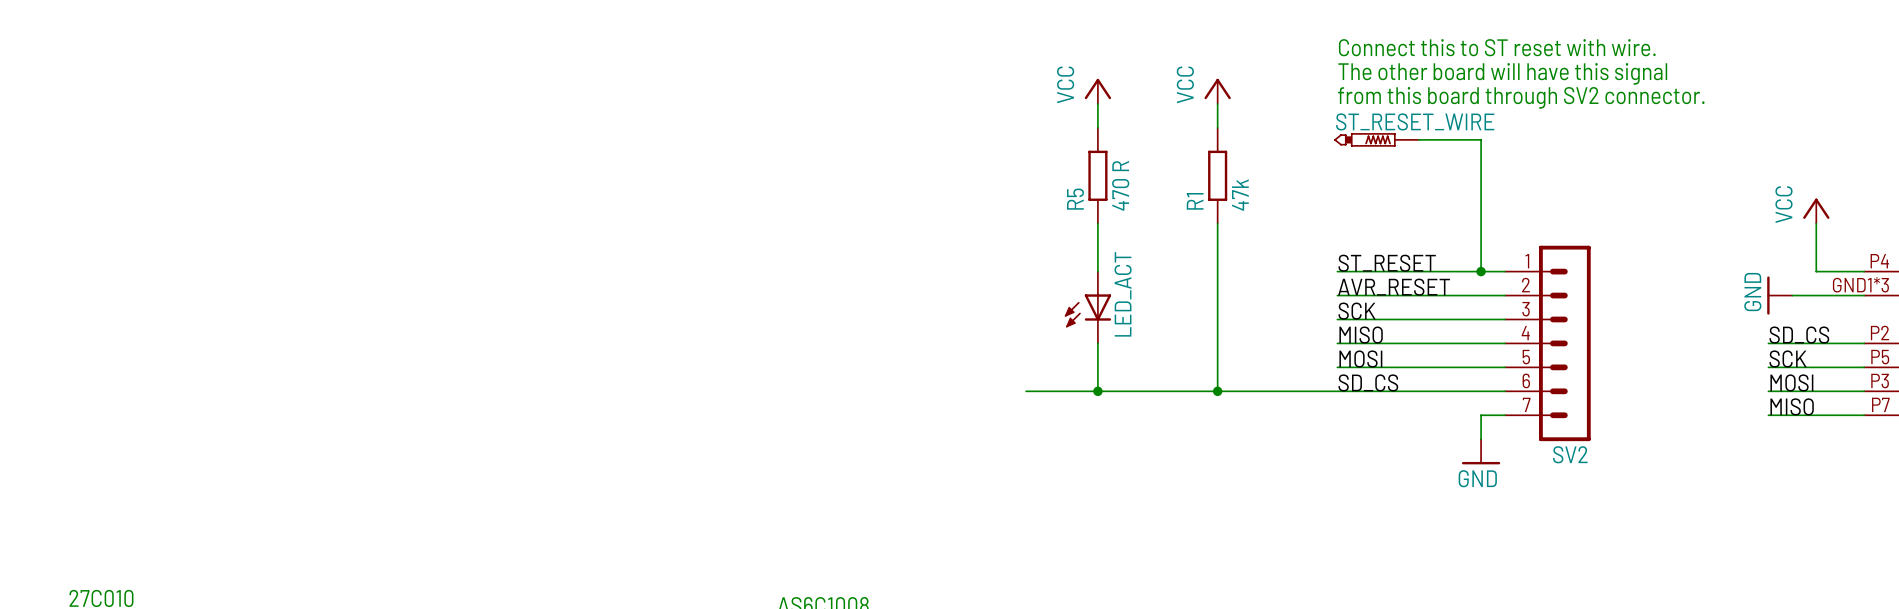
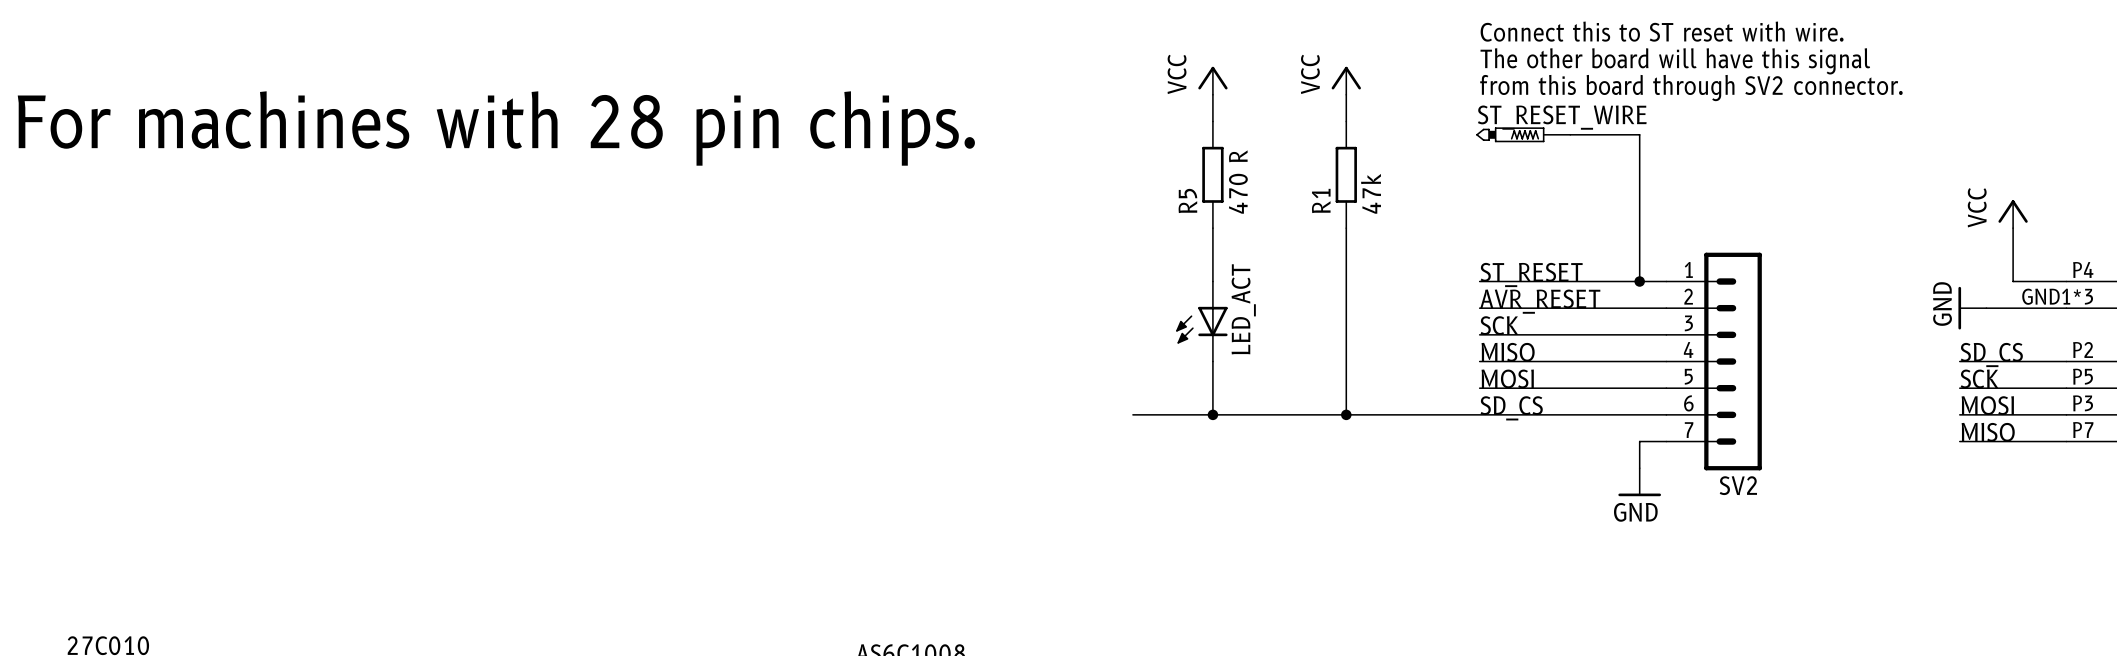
text: none -> For machines with 28 pin chips. (496, 128)

